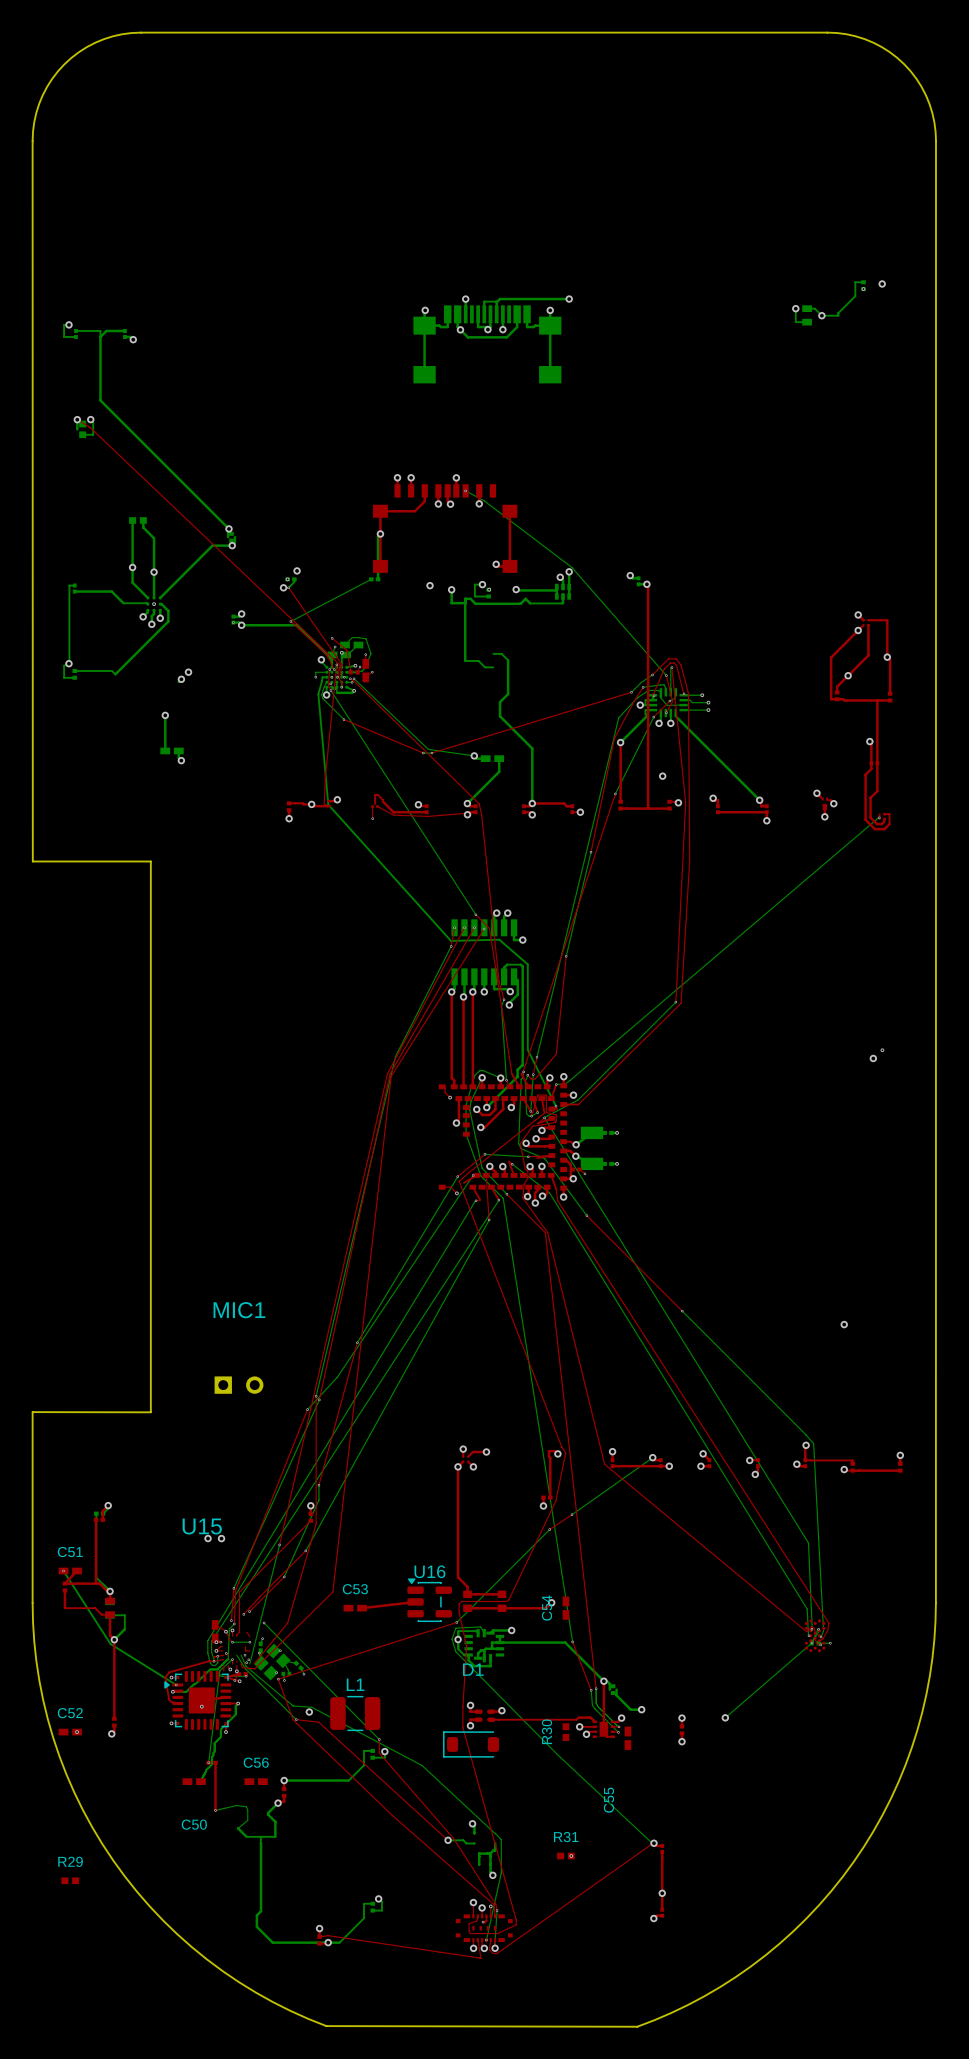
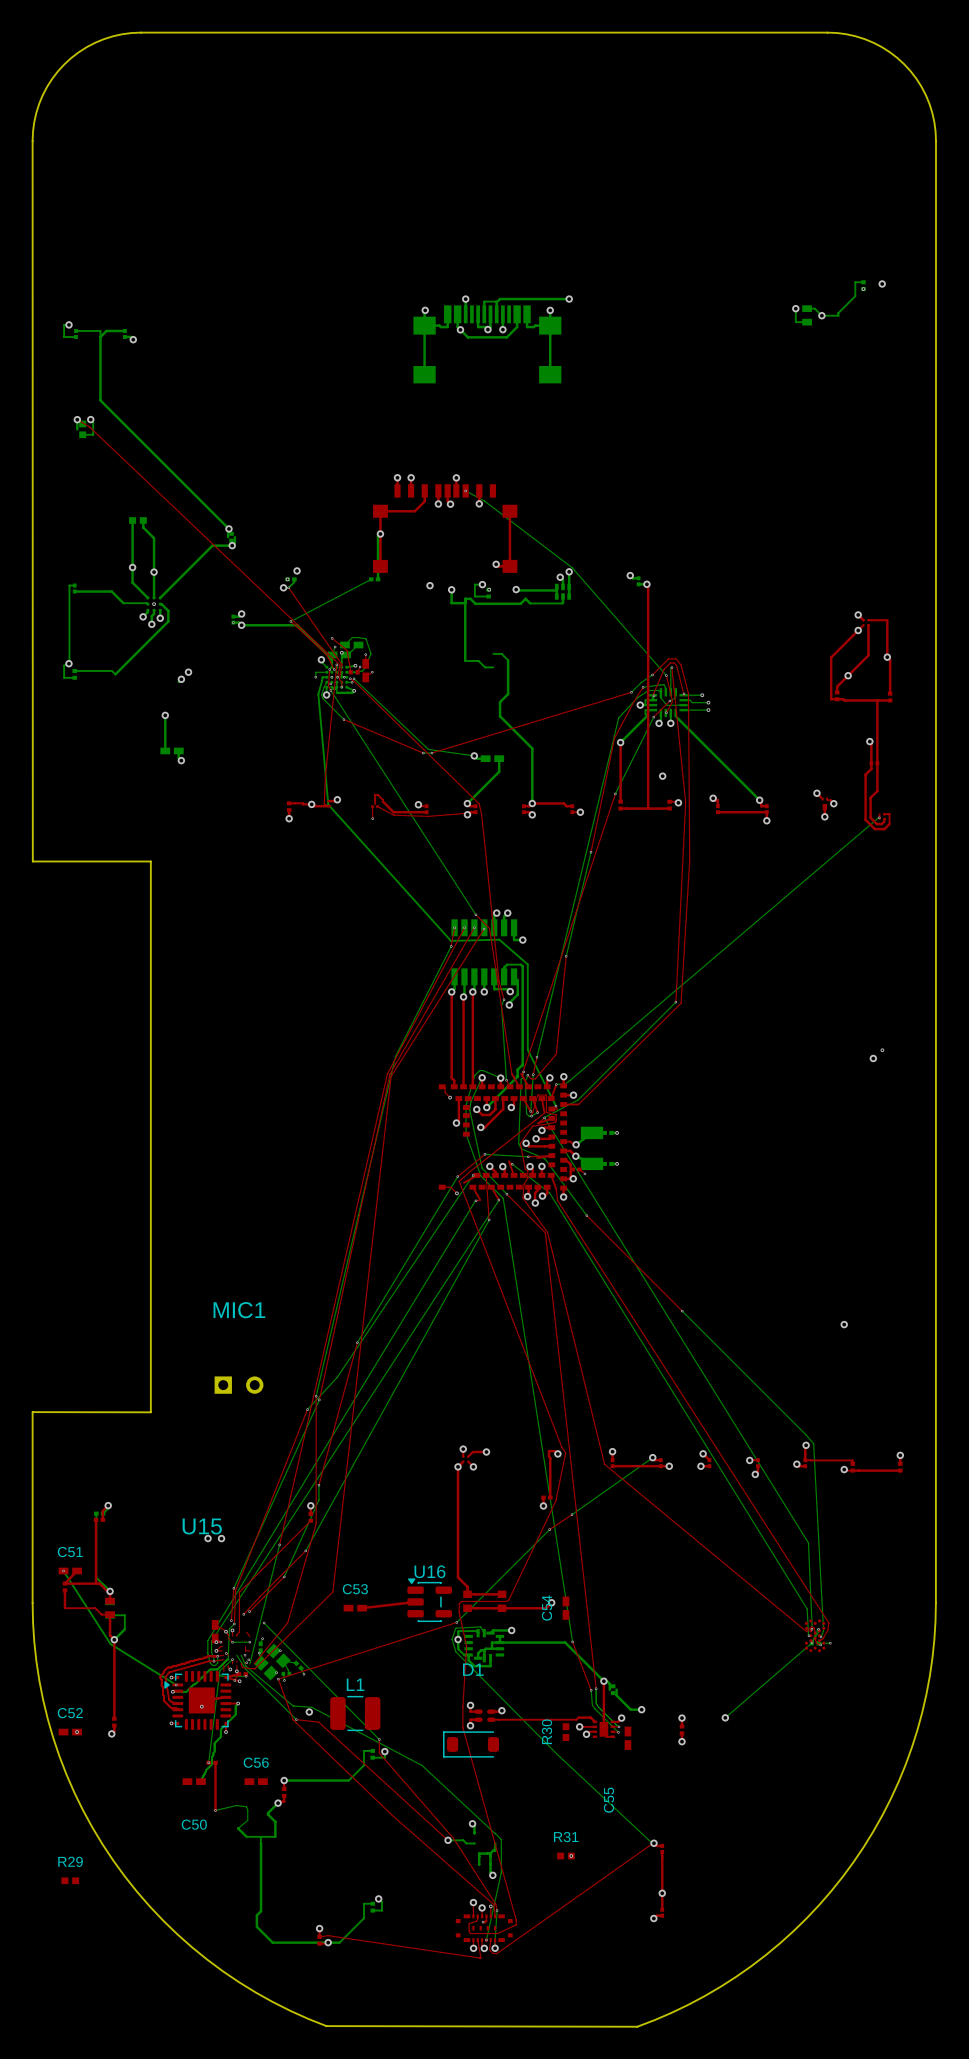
top track: none -> (217, 1656) (207, 1656) (167, 1667) (160, 1676) (164, 1700) (171, 1708) (177, 1709)

